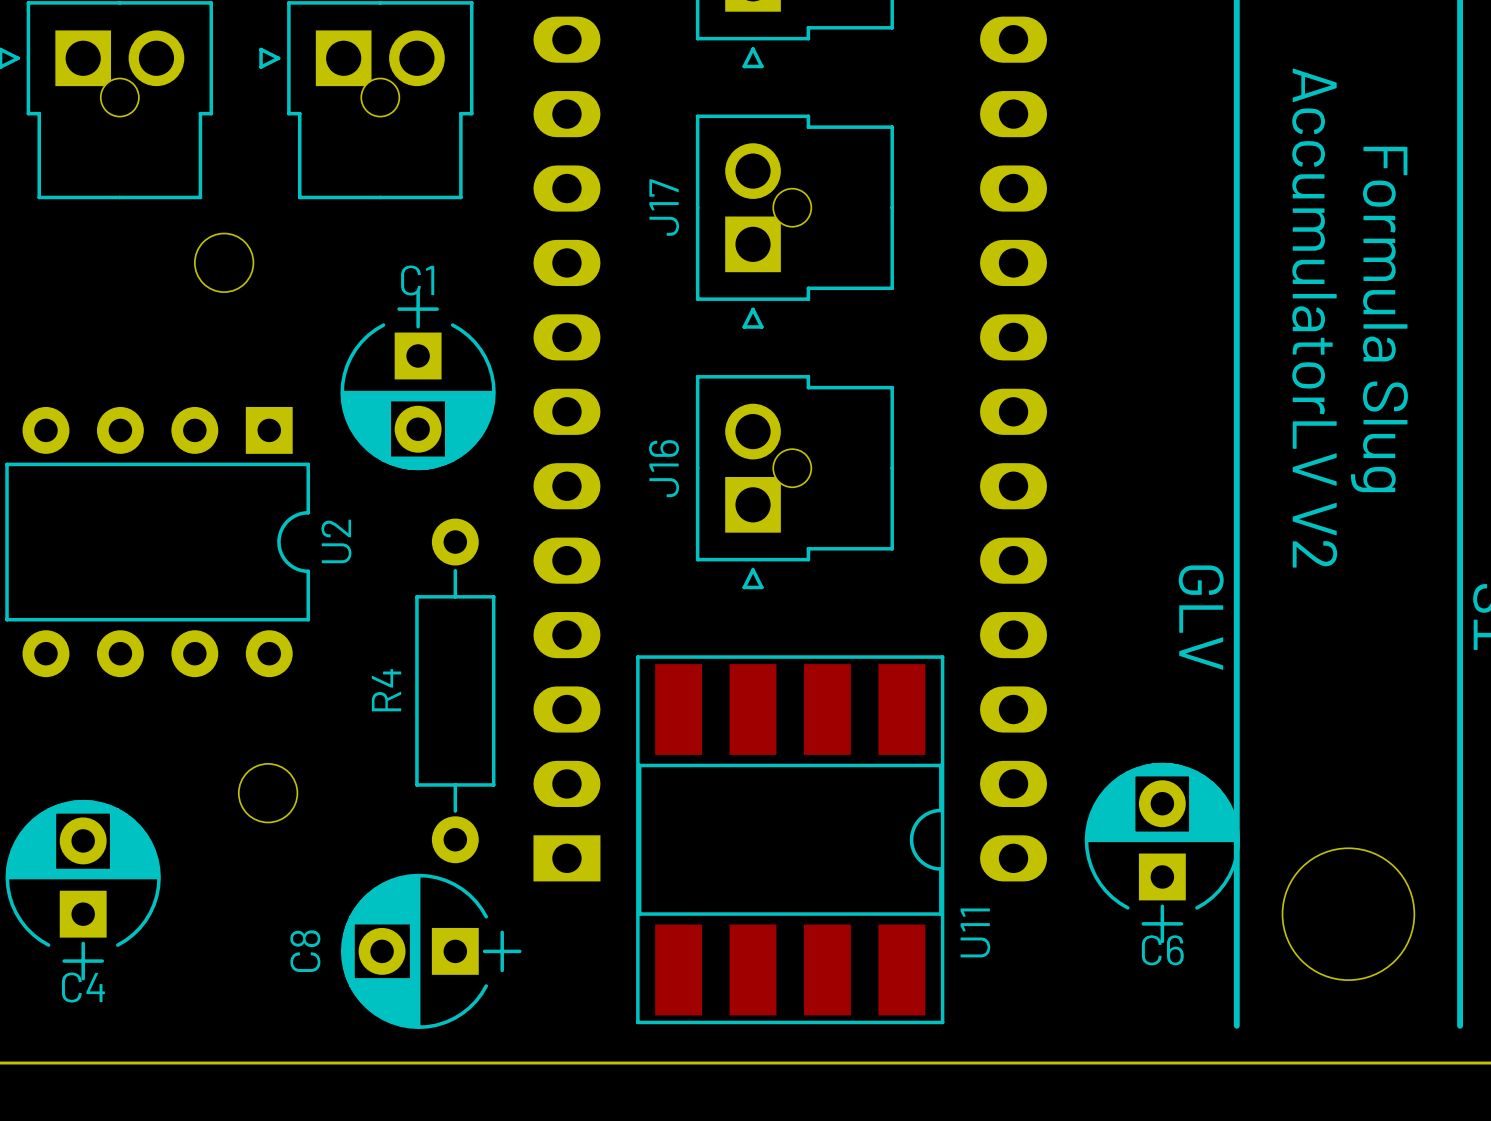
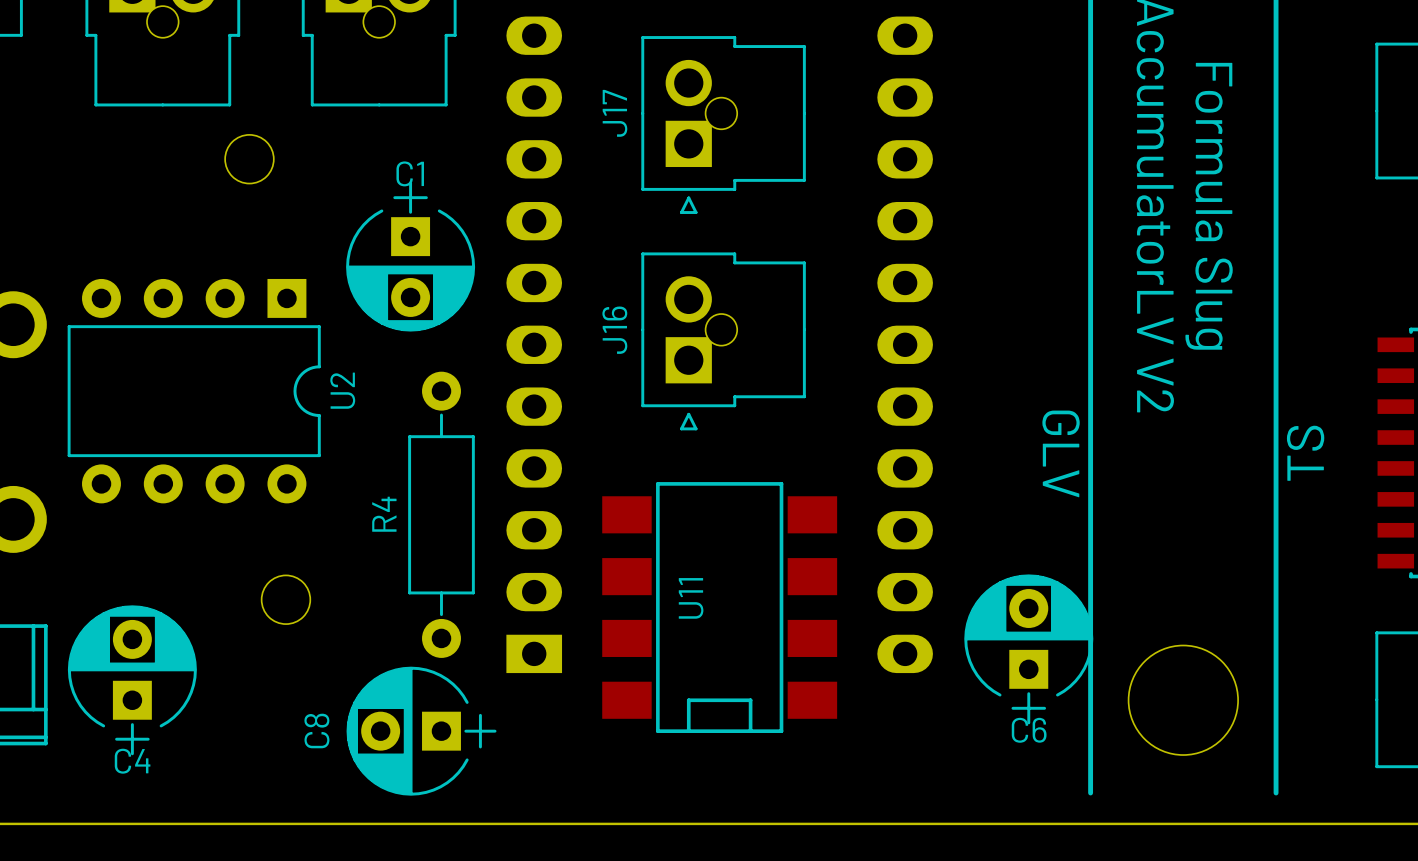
U11 footprint: [636, 655, 945, 1025] -> [602, 482, 838, 734]
U11 name position: U11 (975, 932) -> U11 (691, 598)

